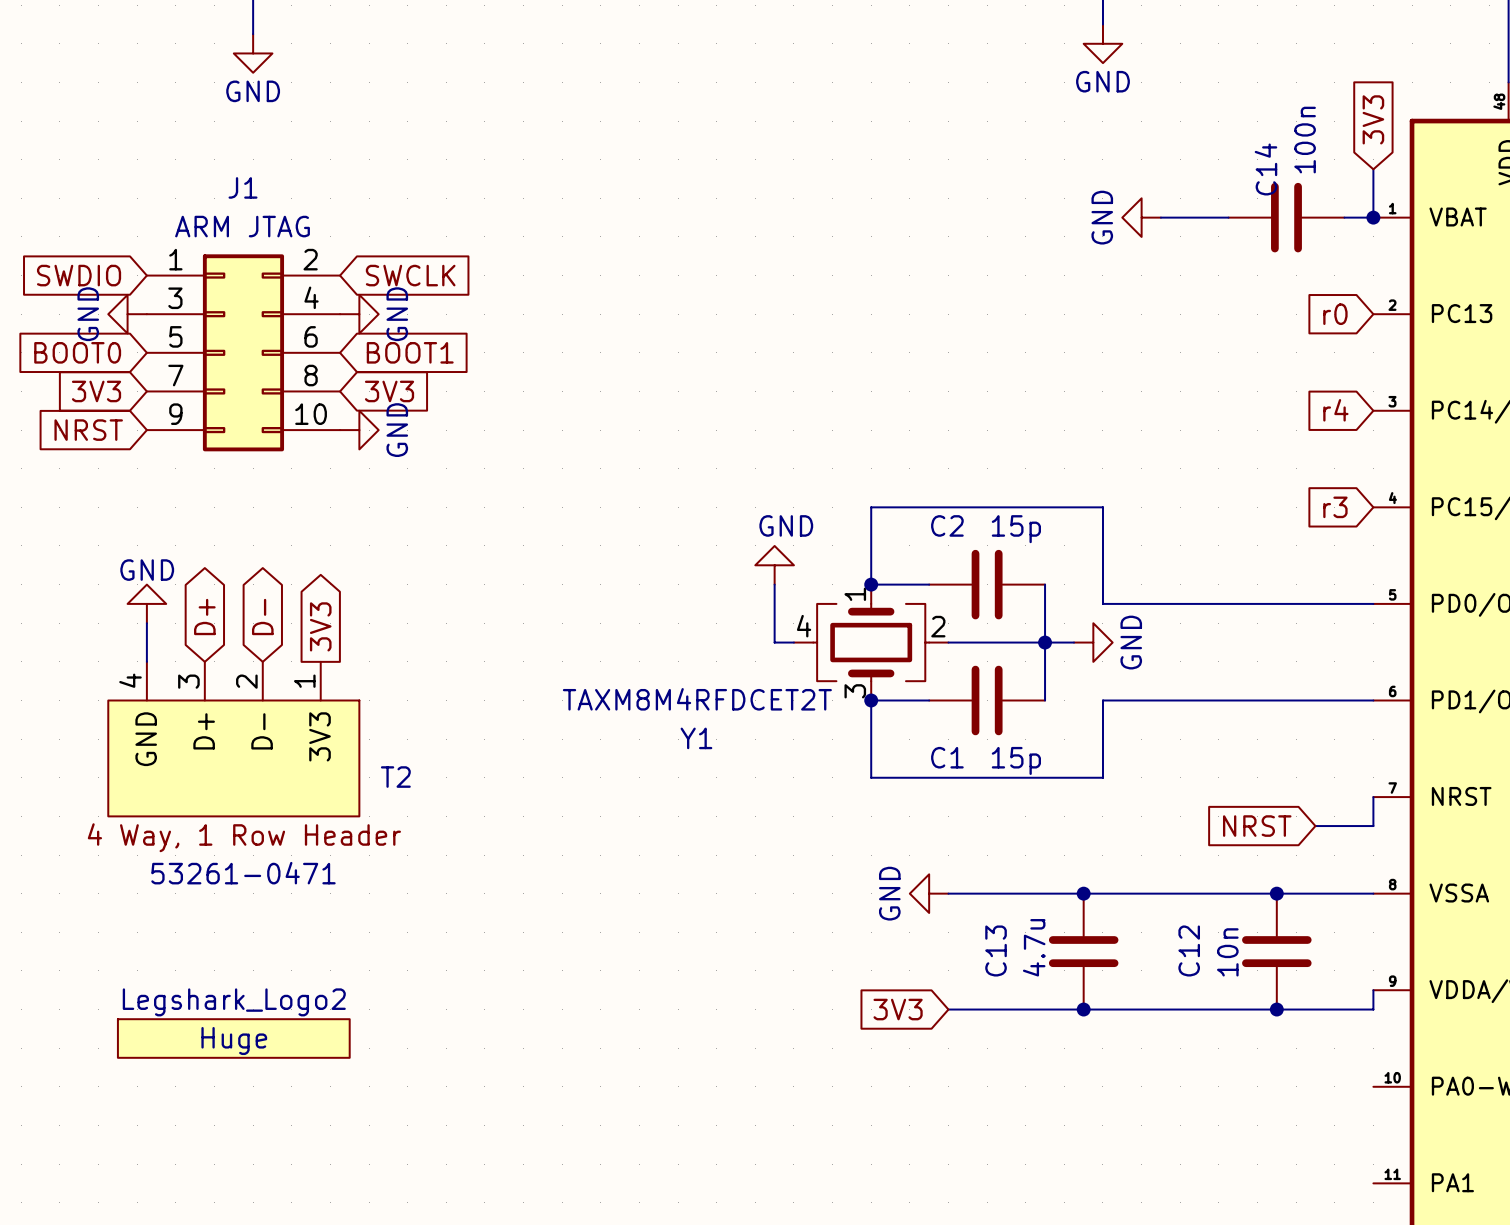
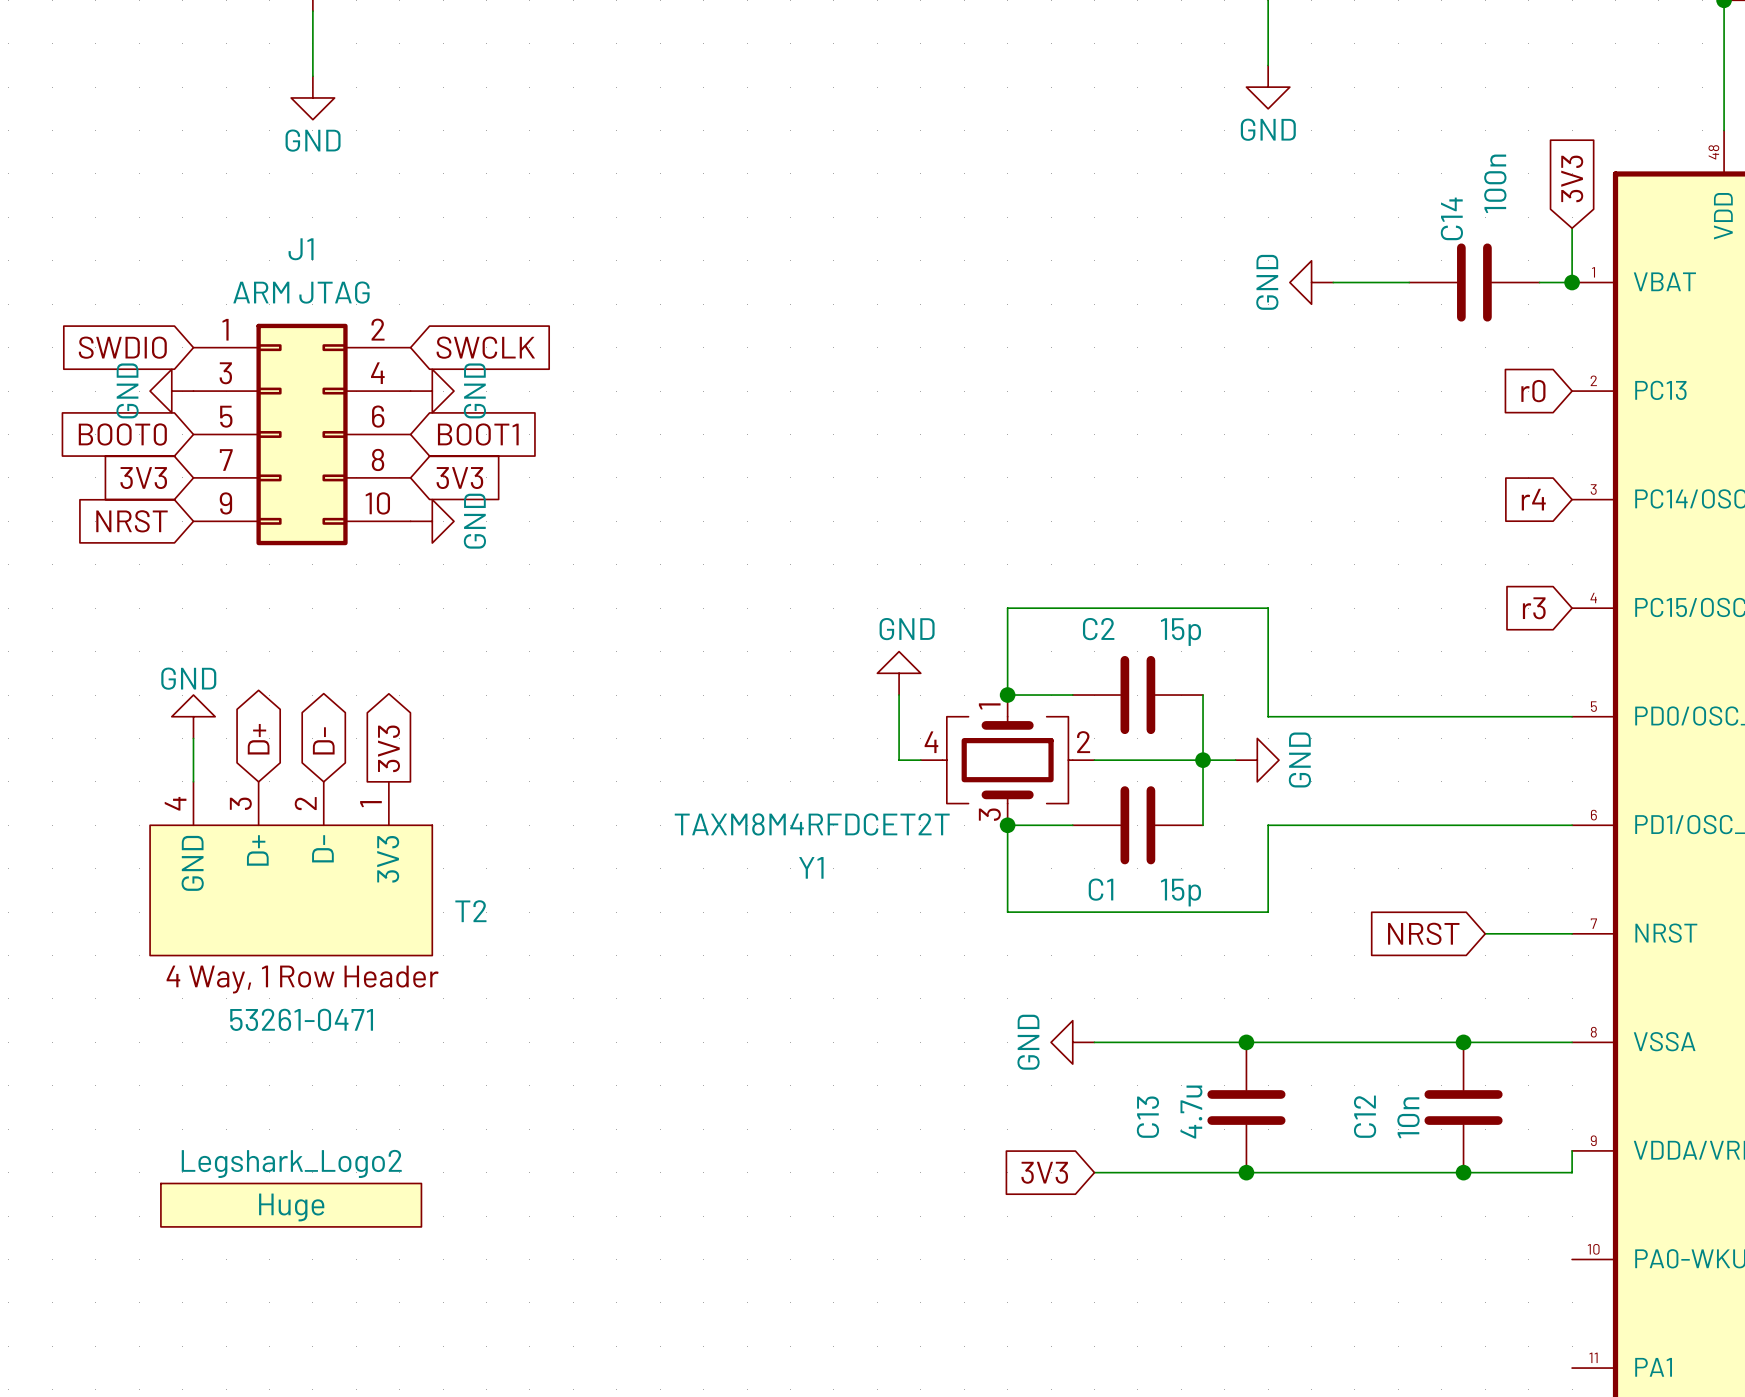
wire: (1373, 797) (1373, 826) (1315, 826) -> (1572, 933) (1485, 933)
global label position: NRST (1257, 826) -> NRST (1423, 933)

